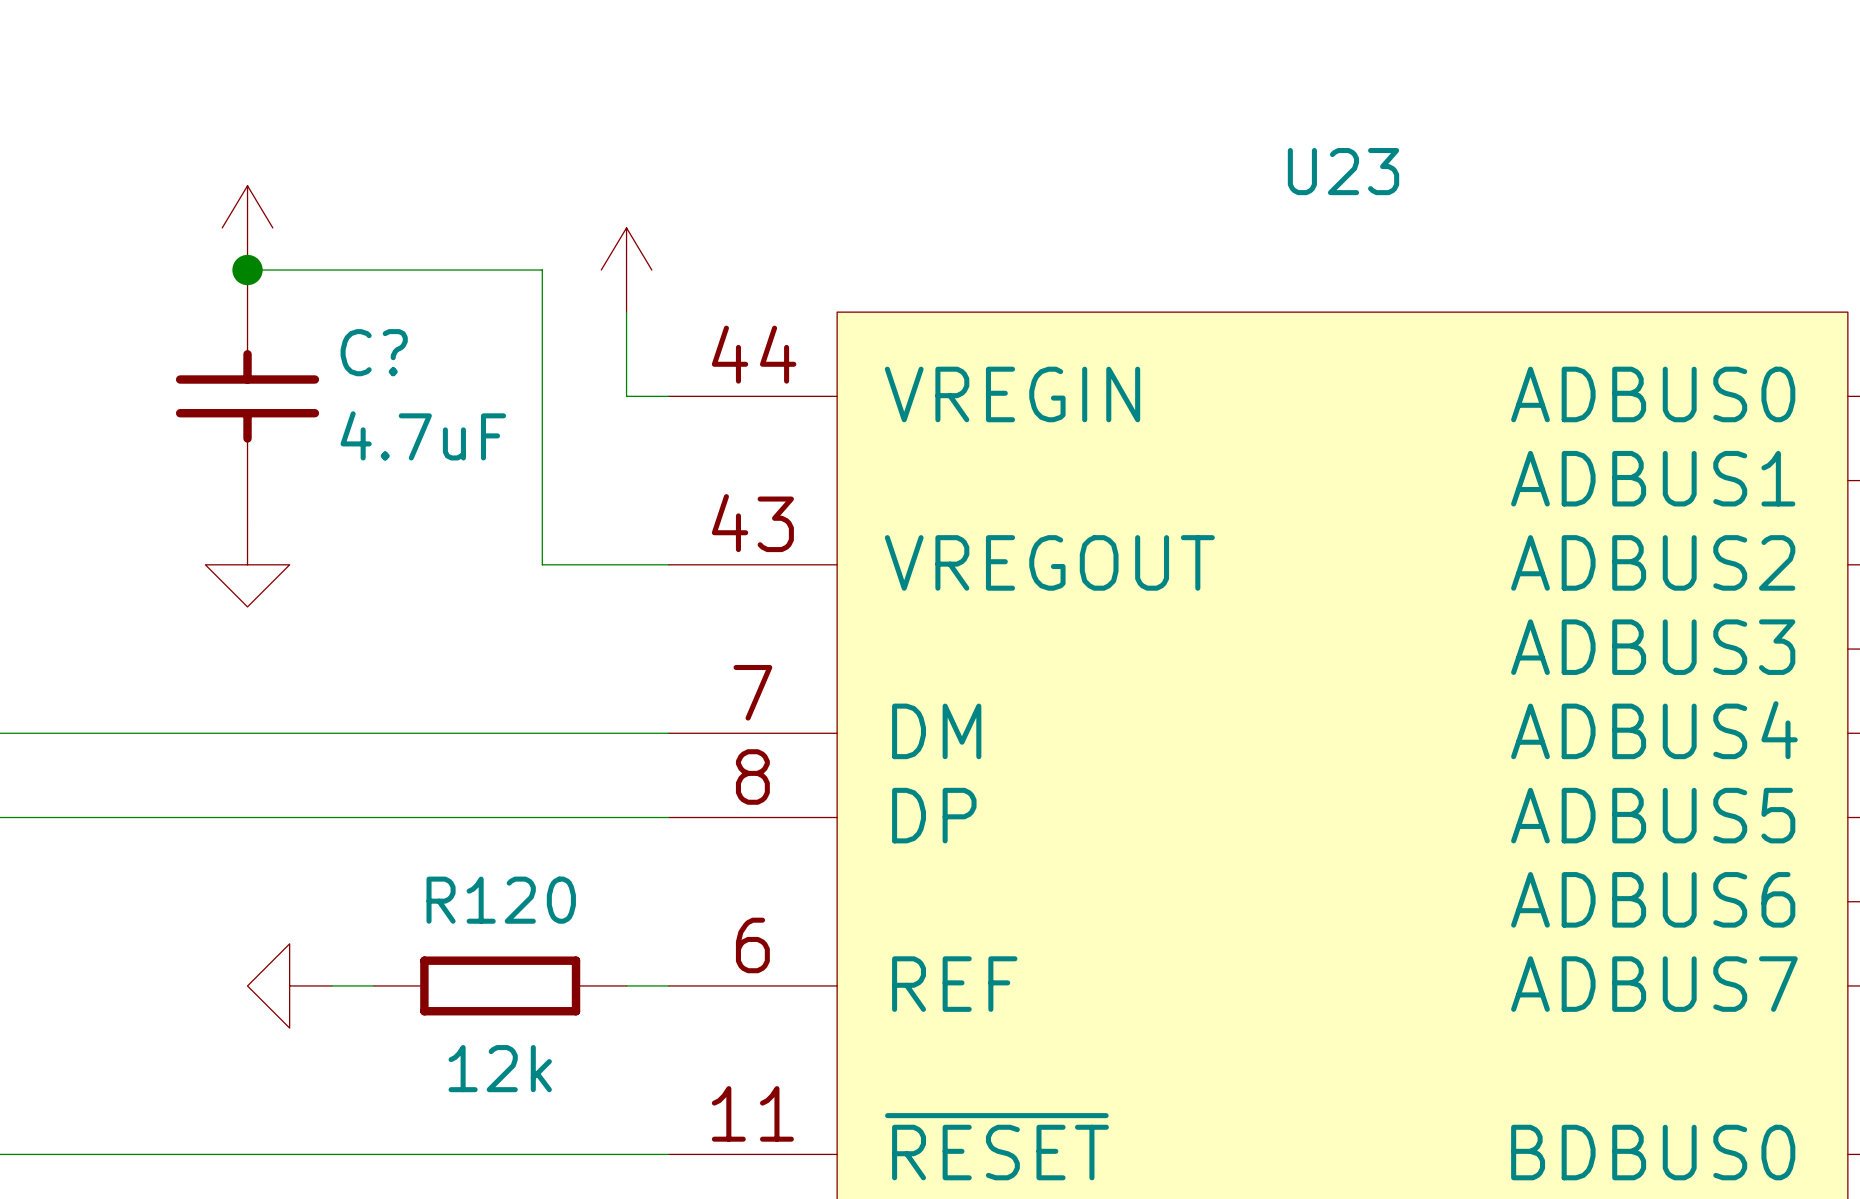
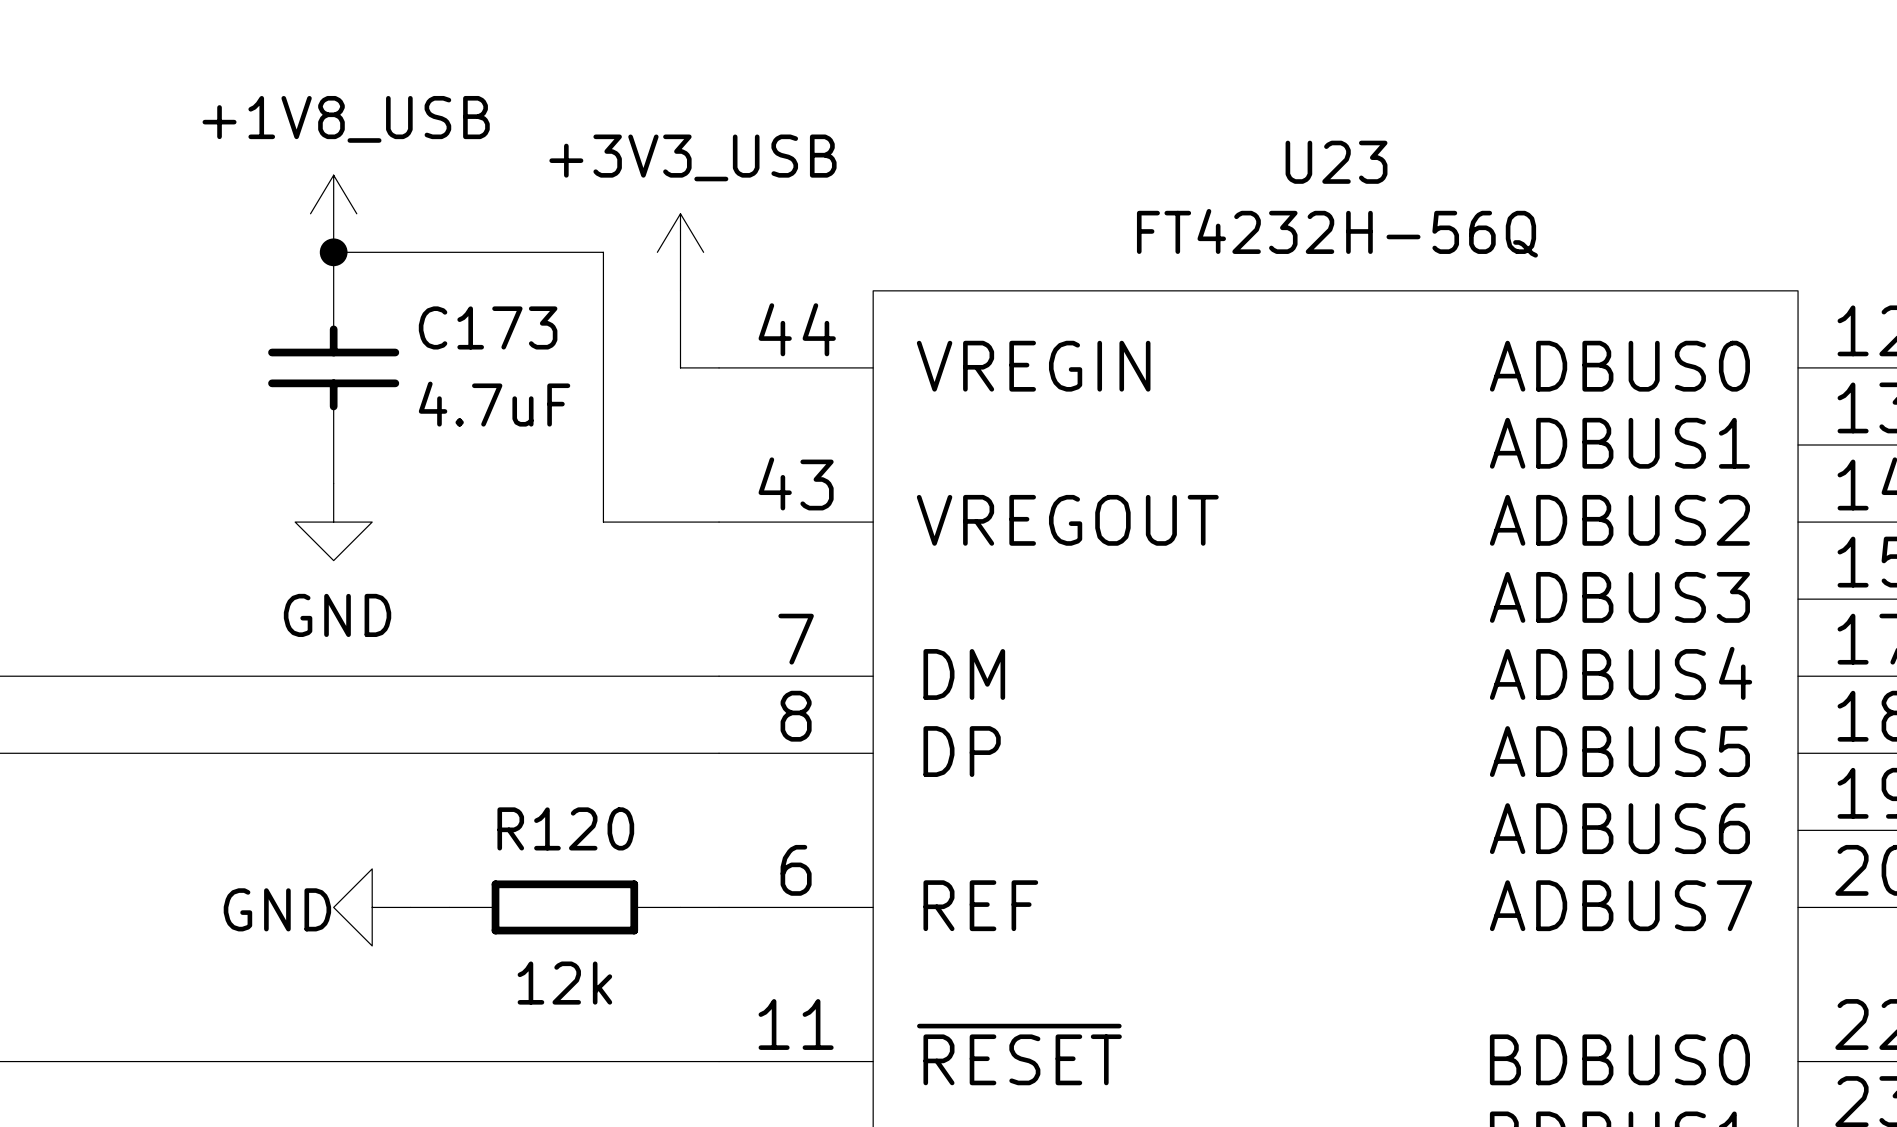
power symbol text: none -> +1V8_USB (346, 119)
power symbol text: none -> +3V3_USB (692, 157)
U23 value: none -> FT4232H-56Q (1337, 233)
C? name: C? (374, 352) -> C173 (488, 327)
power symbol text: none -> GND (337, 615)
power symbol text: none -> GND (277, 909)

